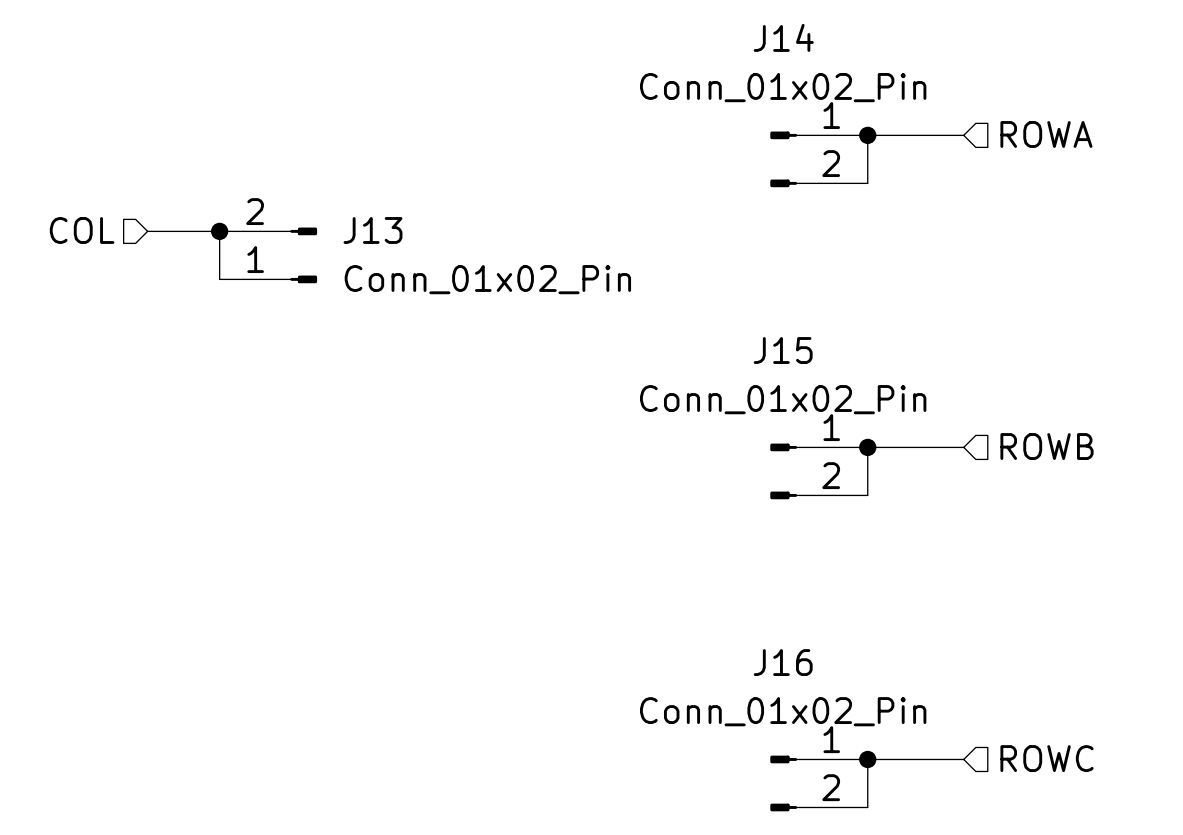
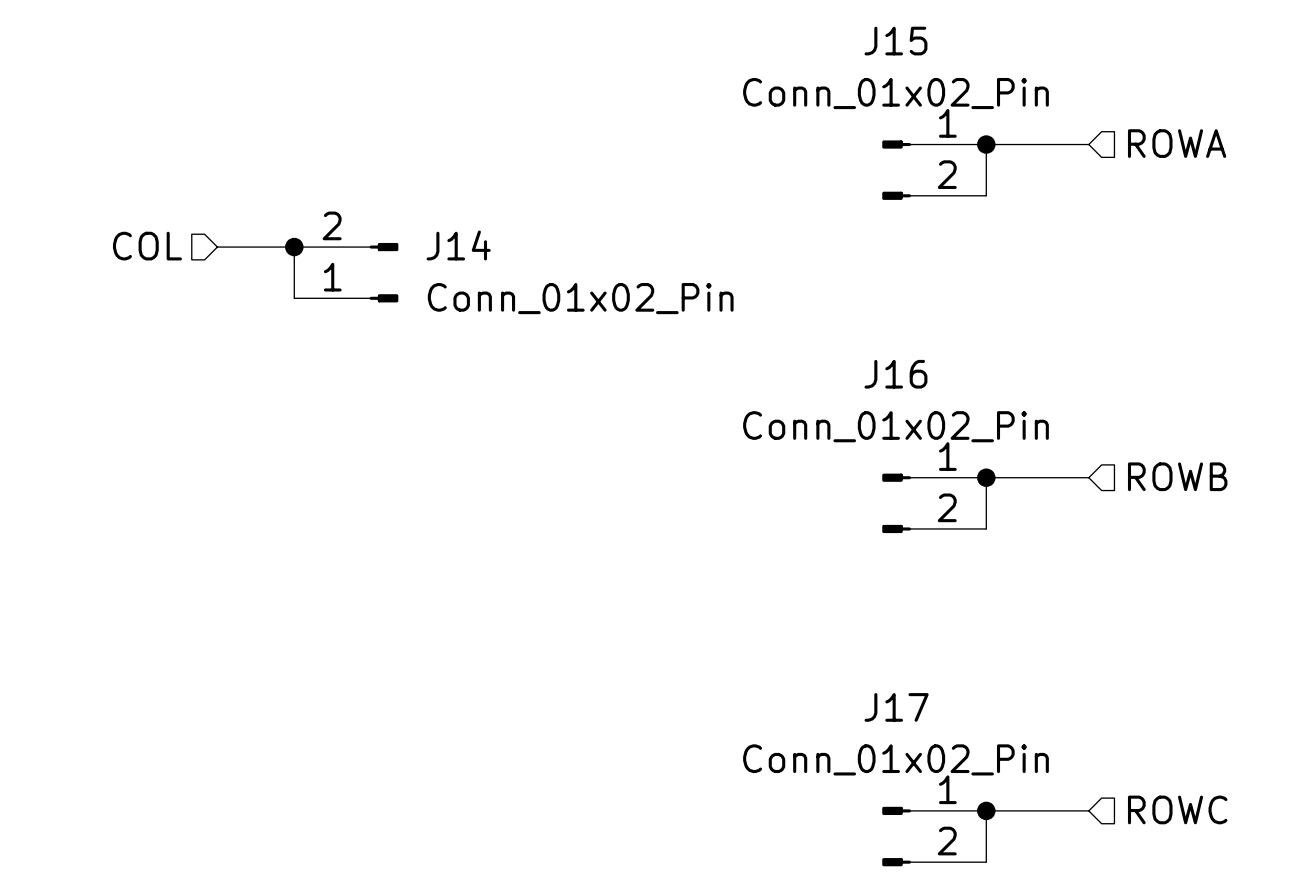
J14 name: J14 (783, 37) -> J15 (895, 41)
J13 name: J13 (372, 230) -> J14 (458, 245)
J15 name: J15 (783, 350) -> J16 (895, 374)
J16 name: J16 (783, 662) -> J17 (896, 707)

